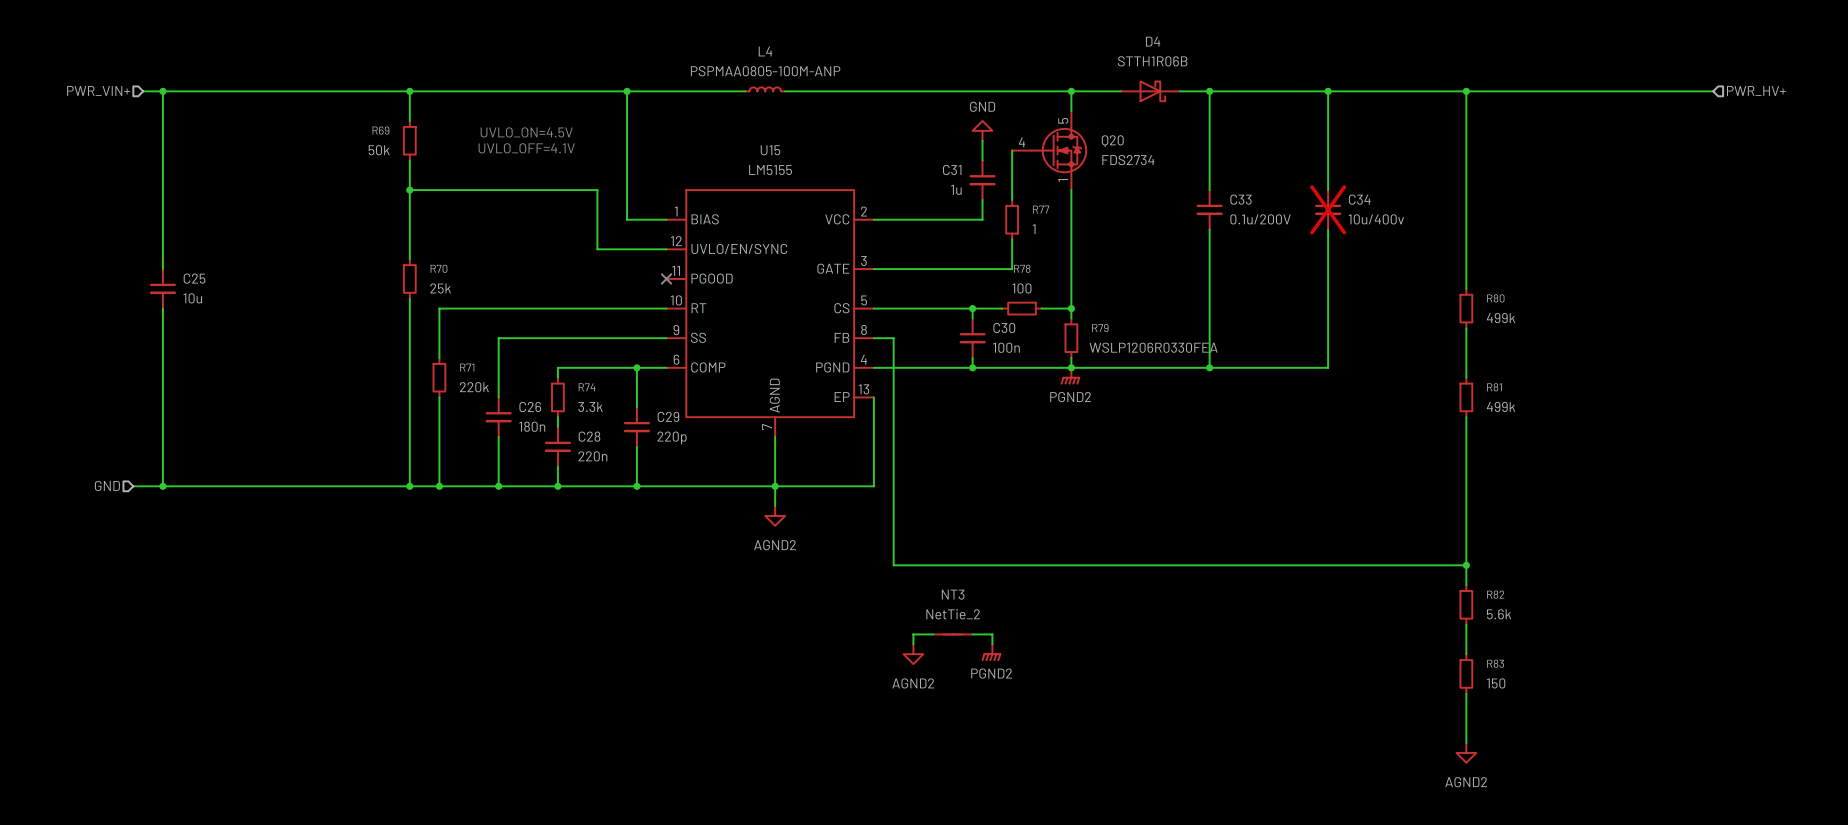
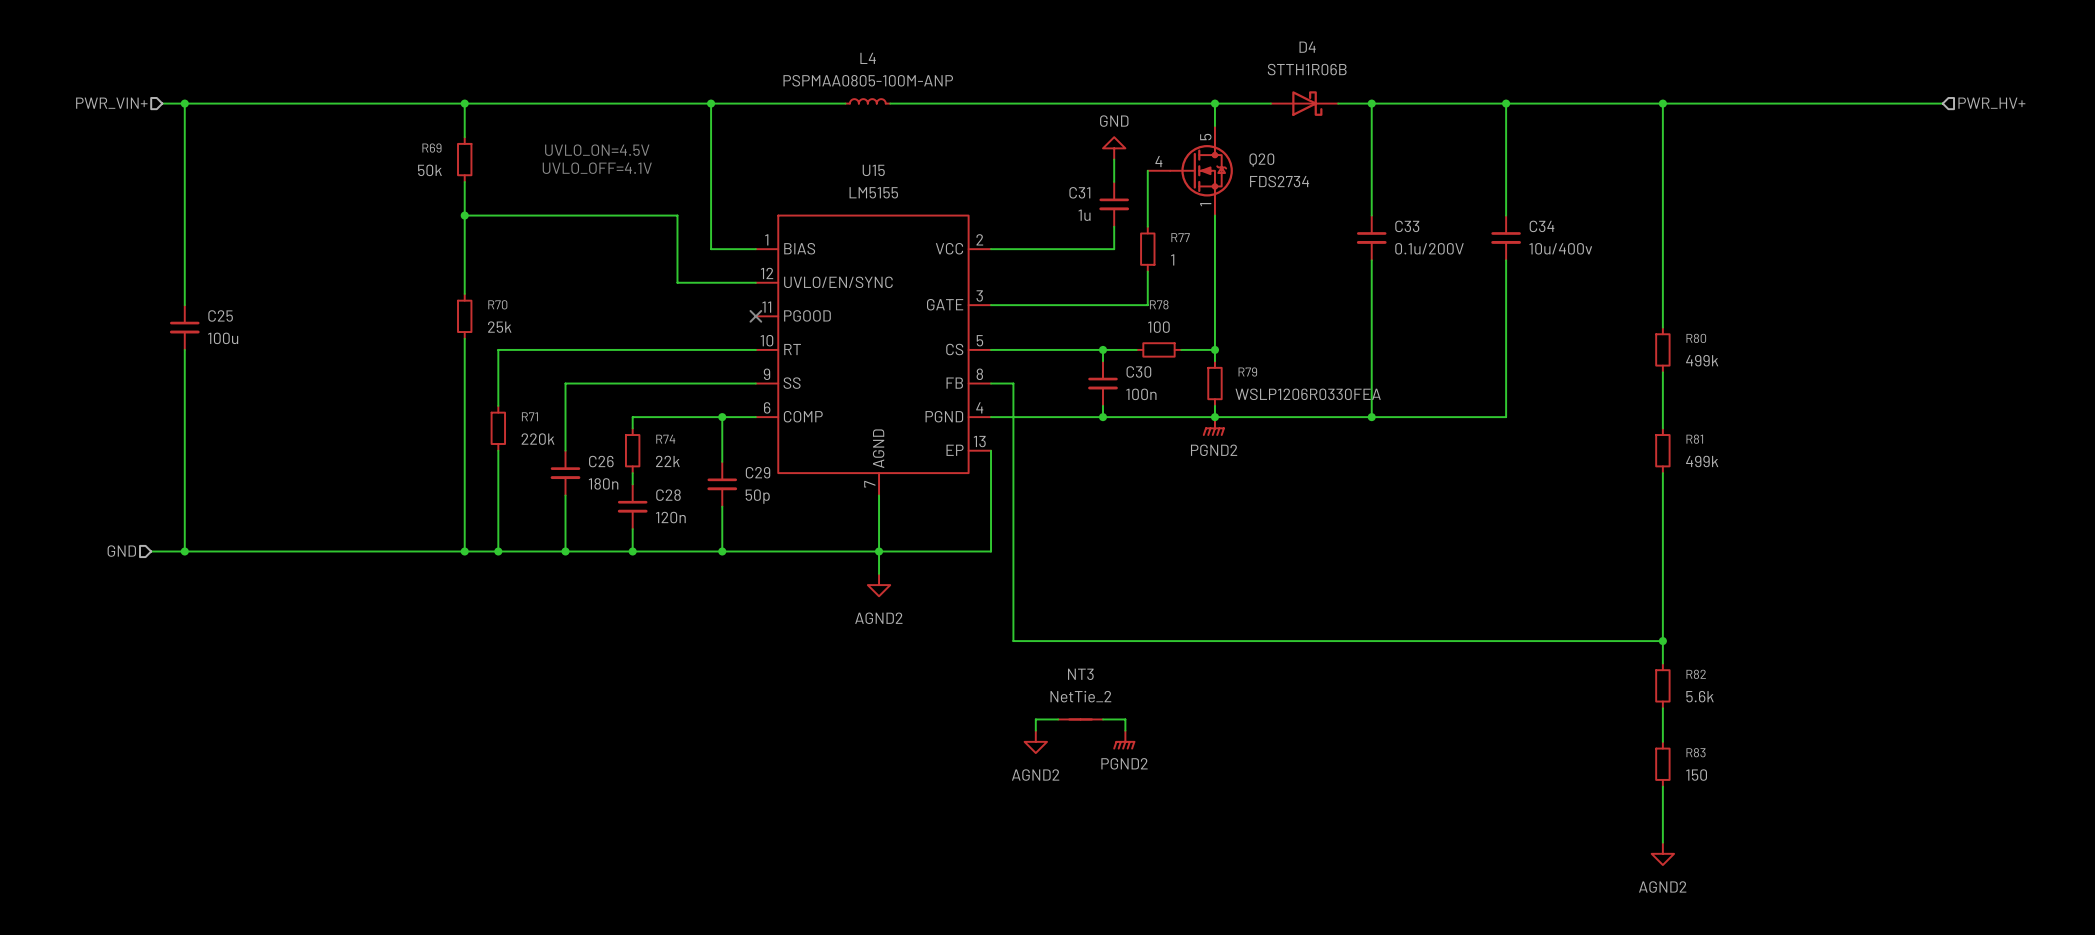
C34 do-not-place cross: (1328, 209) -> none
C25 value: 10u (192, 298) -> 100u (223, 338)
R74 value: 3.3k (590, 407) -> 22k (667, 461)
C29 value: 220p (672, 437) -> 50p (757, 496)
C28 value: 220n (592, 456) -> 120n (670, 517)

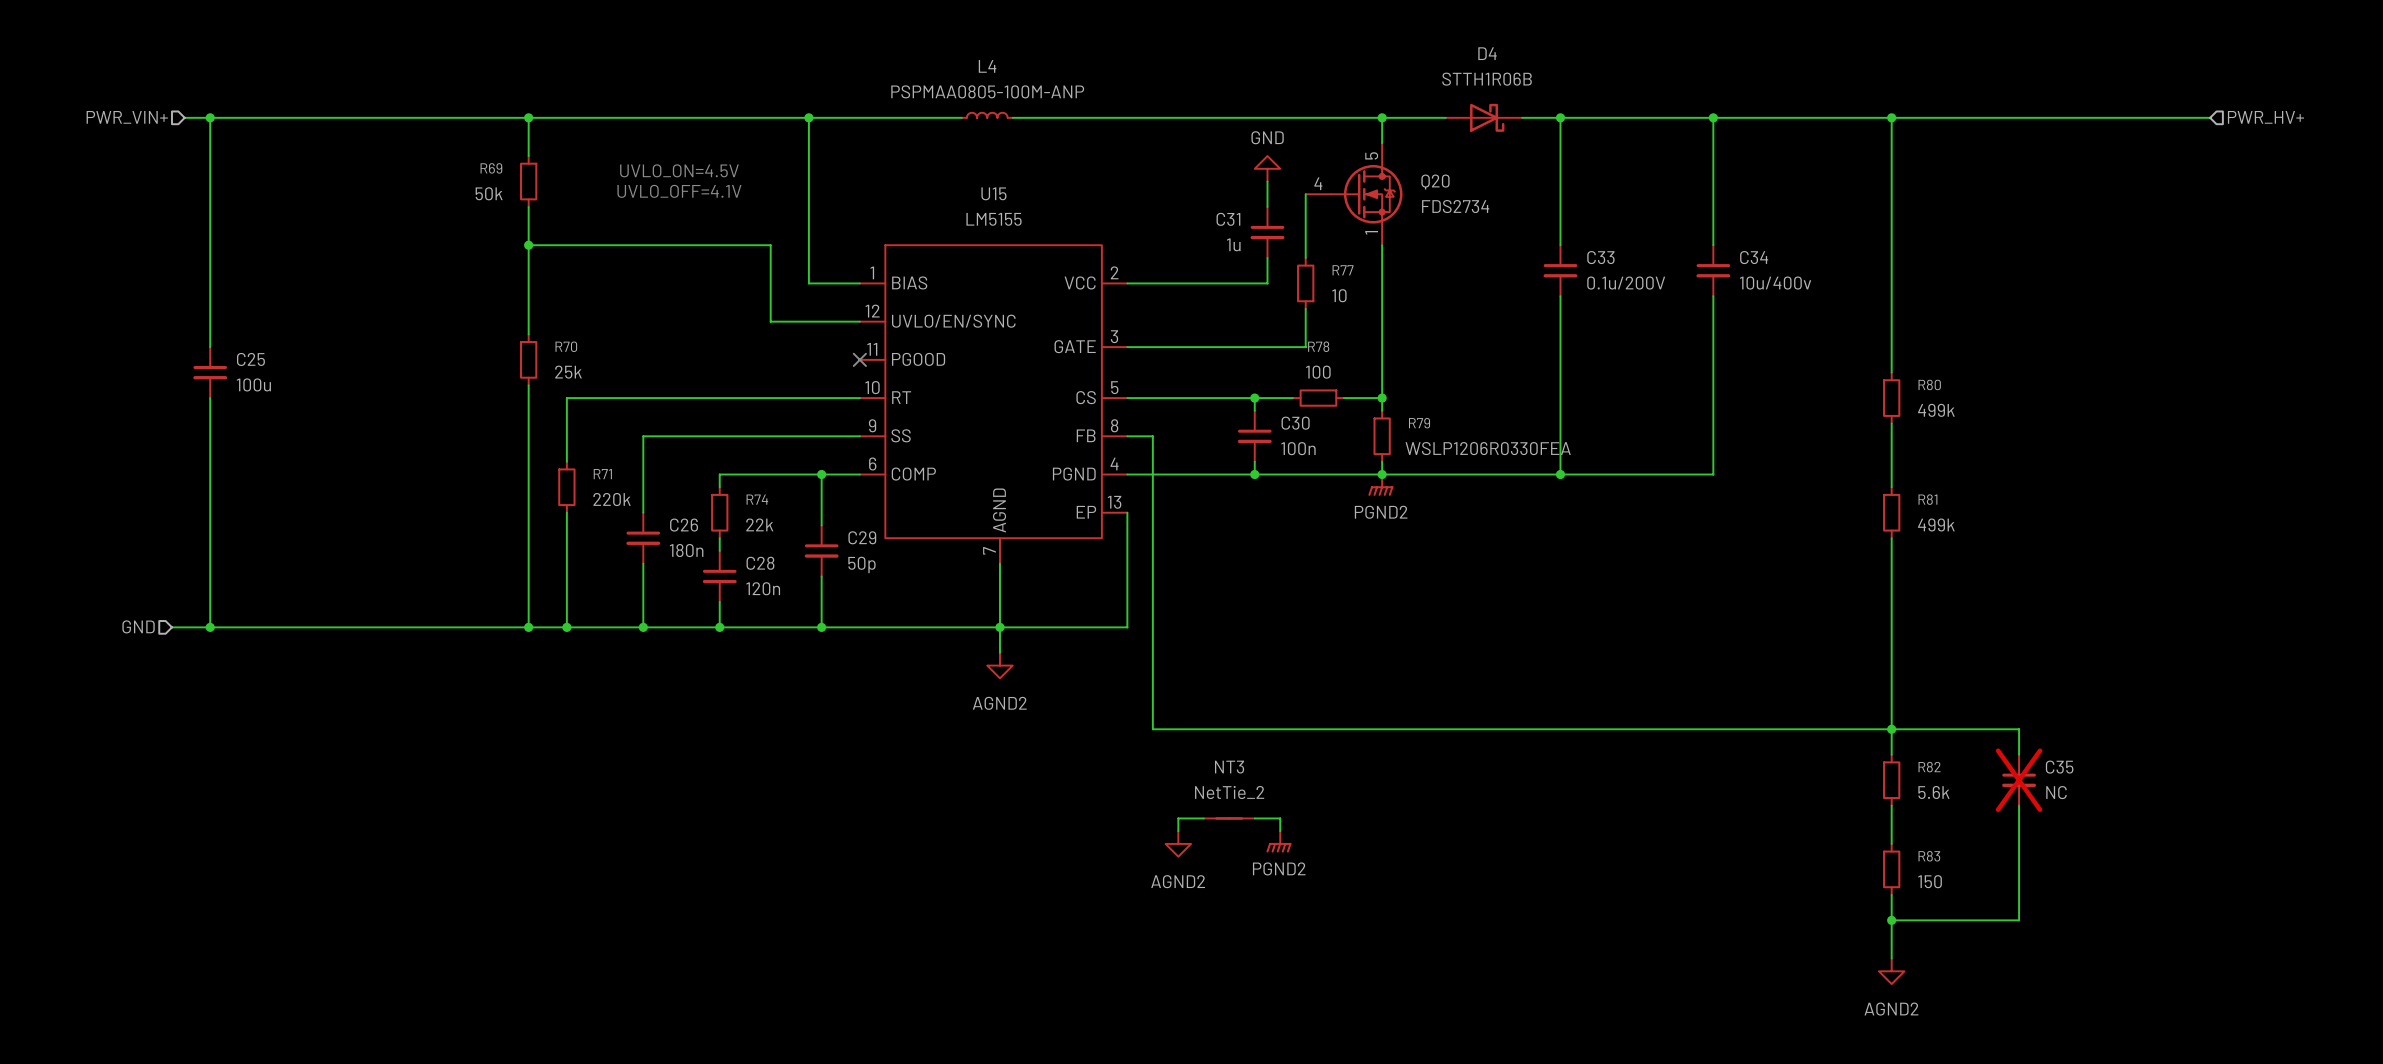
R77 value: 1 (1172, 259) -> 10 (1339, 295)
wire: none -> (1891, 729) (2019, 729) (2019, 754)
C35: none -> NC (2019, 780)
wire: none -> (2019, 805) (2019, 920) (1891, 920)
junction: none -> (1891, 920)

